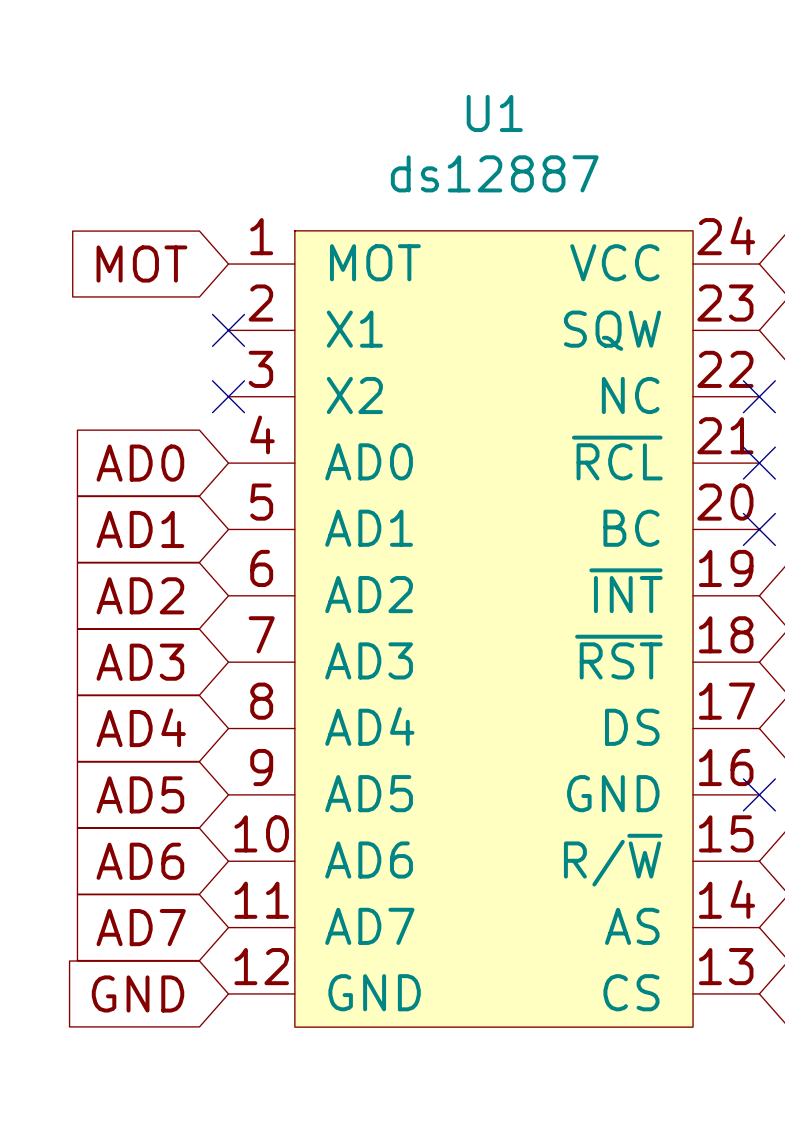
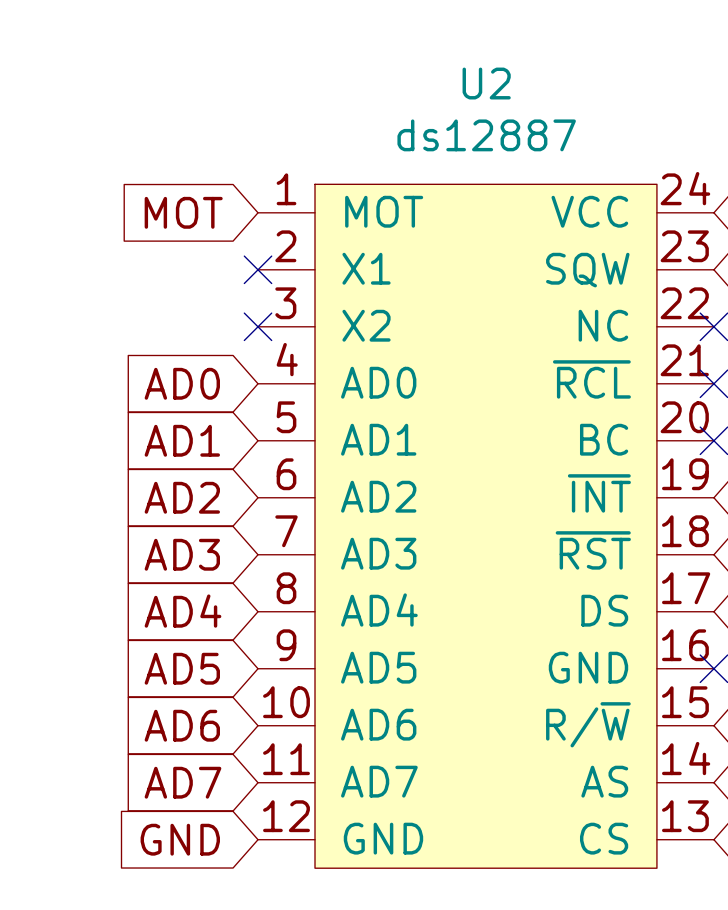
U1 name: U1 (494, 113) -> U2 (486, 83)

